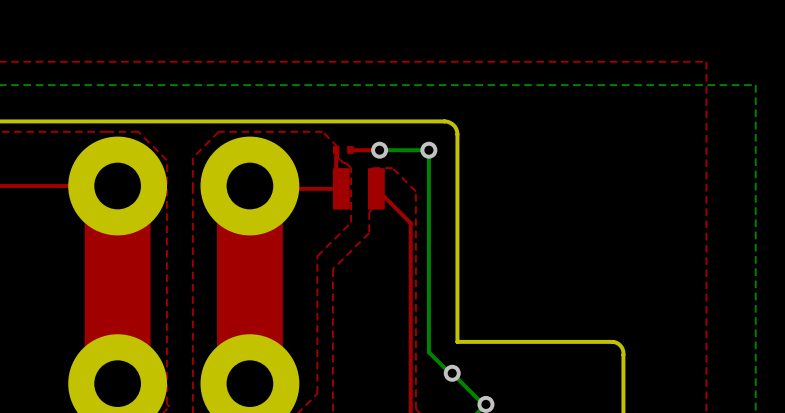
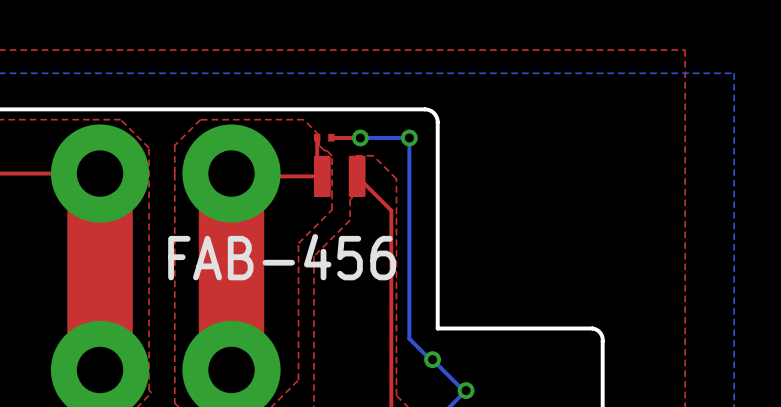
text: none -> FAB-456 (282, 257)

